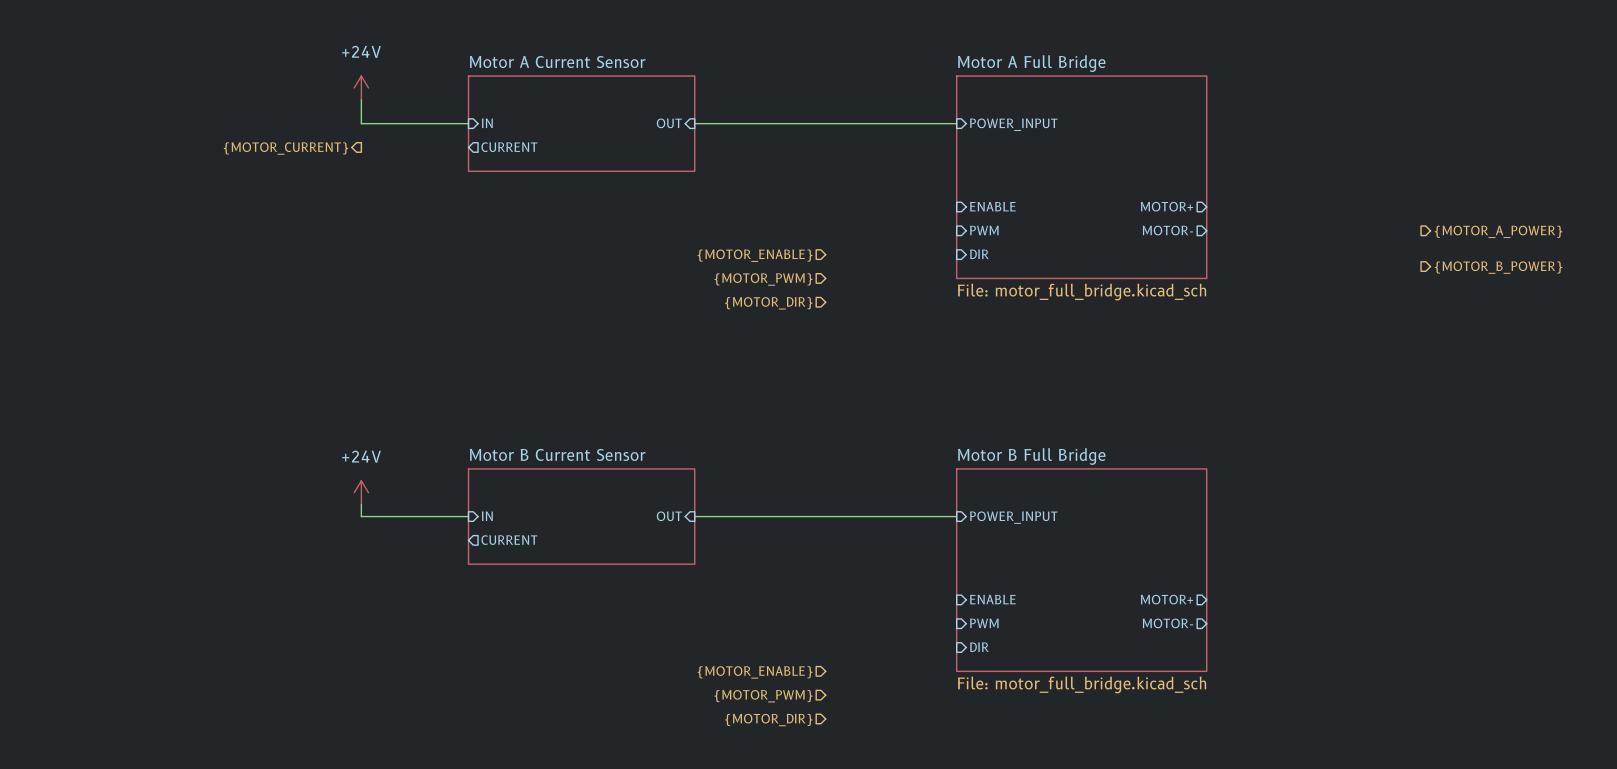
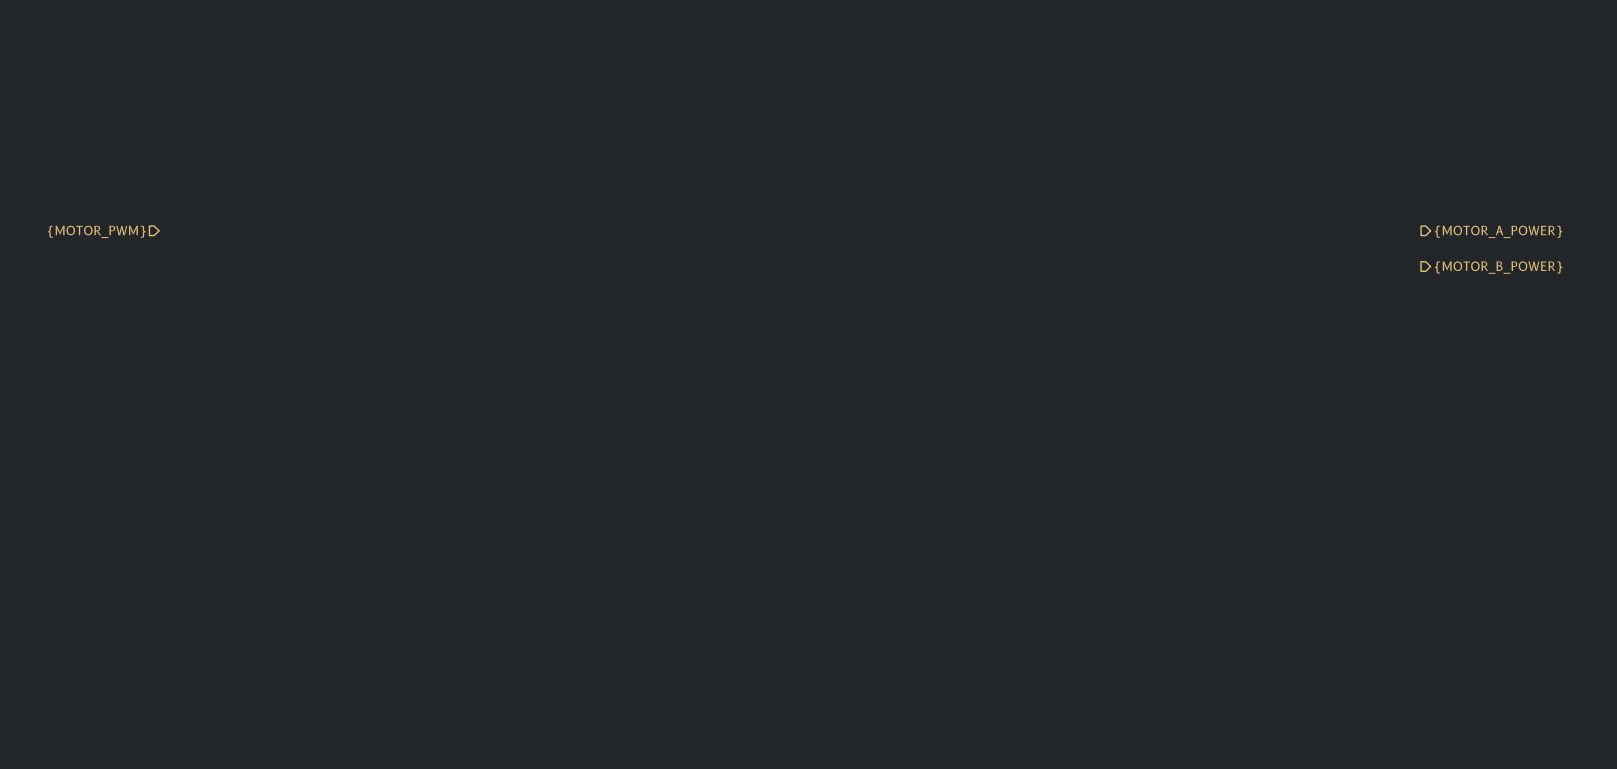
power symbol: +24V (361, 87) -> none
wire: (361, 99) (361, 123) (468, 123) -> none
sheet pin: IN (487, 123) -> none
sheet Motor A Current Sensor: (581, 123) -> none
sheet pin: OUT (669, 123) -> none
wire: (694, 123) (956, 123) -> none
sheet pin: POWER_INPUT (1013, 124) -> none
sheet pin: CURRENT (509, 147) -> none
hierarchical label: {MOTOR_CURRENT} (286, 148) -> none
sheet Motor A Full Bridge: File: motor_full_bridge.kicad_sch (1081, 177) -> none
sheet pin: ENABLE (992, 206) -> none
sheet pin: MOTOR+ (1166, 206) -> none
sheet pin: PWM (984, 230) -> none
sheet pin: MOTOR- (1167, 230) -> none
hierarchical label: none -> {MOTOR_PWM} (96, 231)
sheet pin: DIR (979, 254) -> none
hierarchical label: {MOTOR_ENABLE} (755, 255) -> none
hierarchical label: {MOTOR_PWM} (763, 279) -> none
hierarchical label: {MOTOR_DIR} (768, 303) -> none
power symbol: +24V (361, 492) -> none
wire: (361, 504) (361, 516) (468, 516) -> none
sheet pin: IN (487, 516) -> none
sheet Motor B Current Sensor: (581, 516) -> none
sheet pin: OUT (669, 516) -> none
wire: (694, 516) (956, 516) -> none
sheet pin: POWER_INPUT (1013, 517) -> none
sheet pin: CURRENT (509, 540) -> none
sheet Motor B Full Bridge: File: motor_full_bridge.kicad_sch (1081, 570) -> none
sheet pin: ENABLE (992, 599) -> none
sheet pin: MOTOR+ (1166, 599) -> none
sheet pin: PWM (984, 623) -> none
sheet pin: MOTOR- (1167, 623) -> none
sheet pin: DIR (979, 647) -> none
hierarchical label: {MOTOR_ENABLE} (755, 672) -> none
hierarchical label: {MOTOR_PWM} (763, 696) -> none
hierarchical label: {MOTOR_DIR} (768, 720) -> none

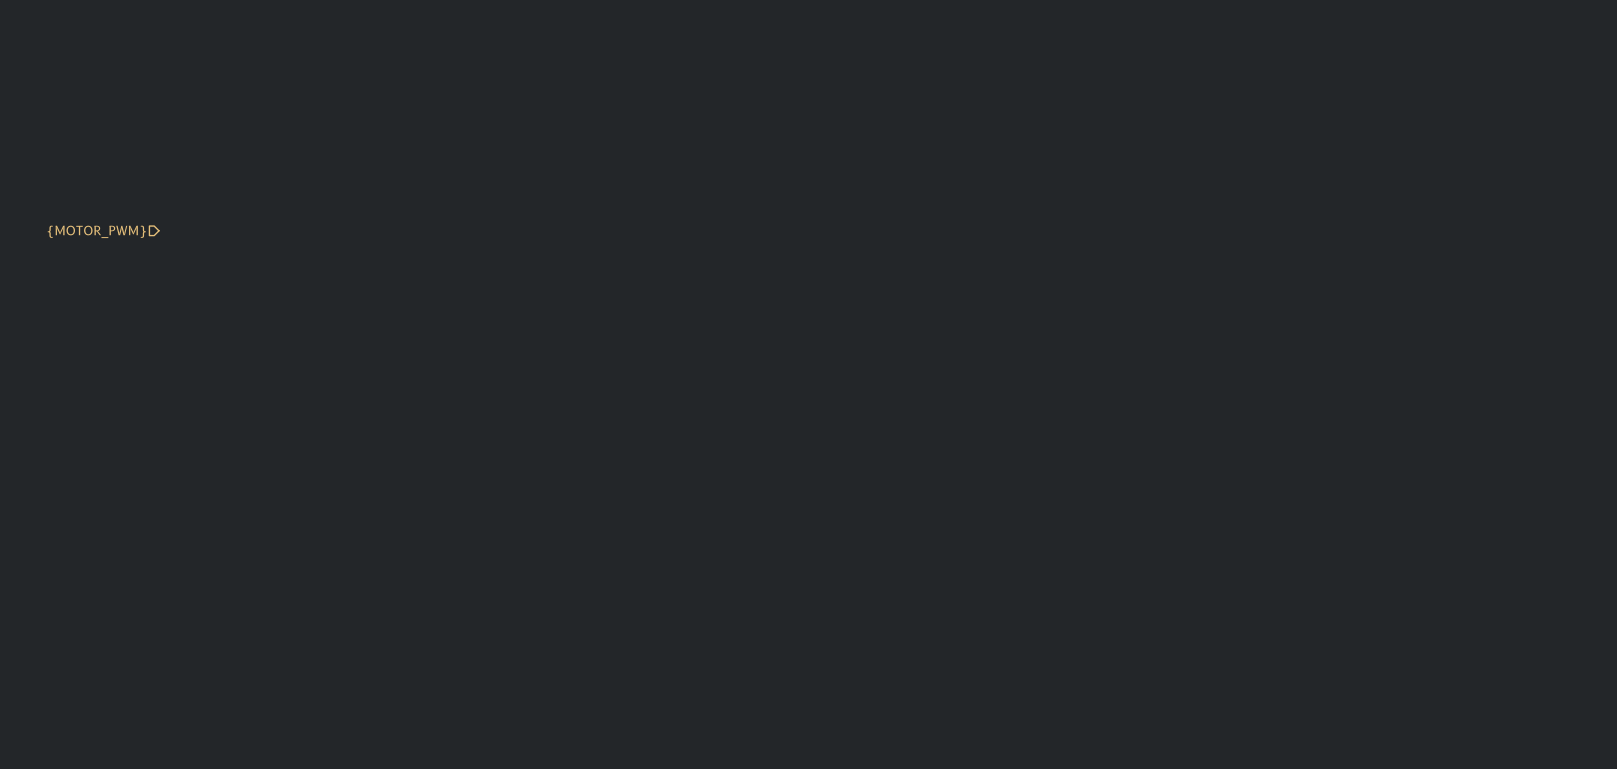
hierarchical label: {MOTOR_A_POWER} (1498, 231) -> none
hierarchical label: {MOTOR_B_POWER} (1498, 267) -> none

